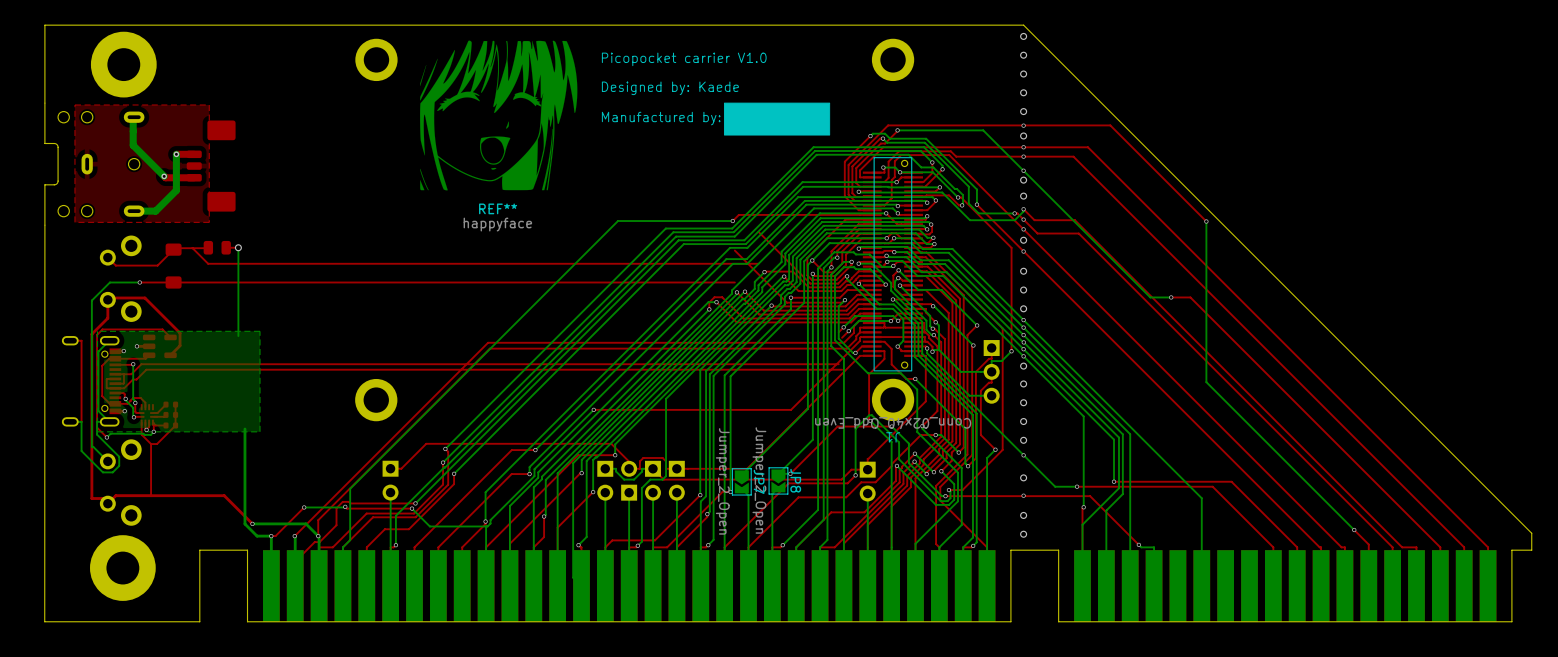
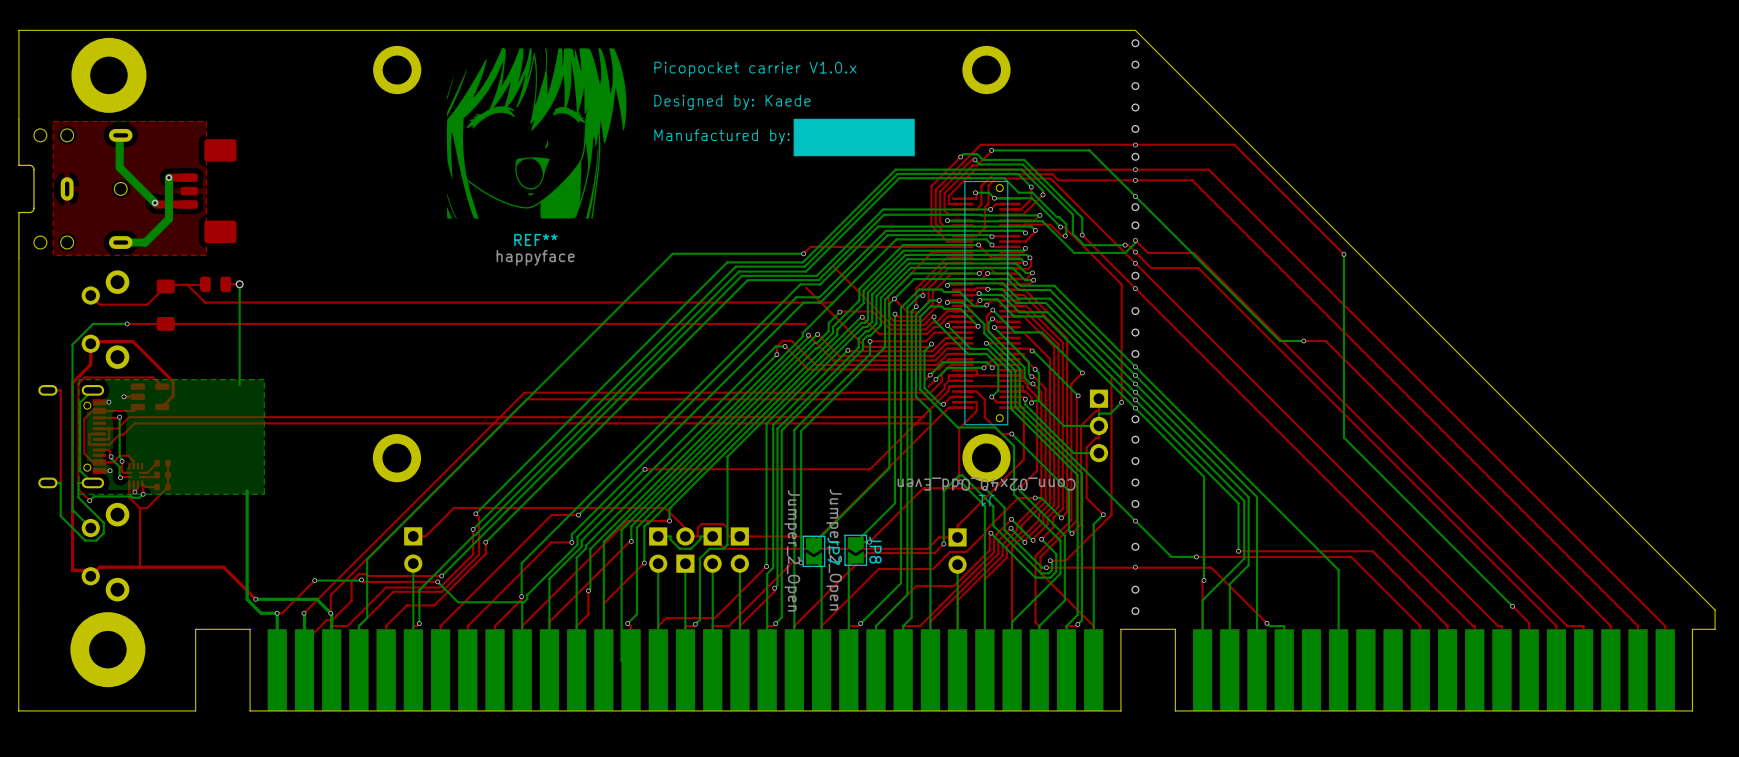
text: Picopocket carrier V1.0 (684, 59) -> Picopocket carrier V1.0.x (755, 69)

